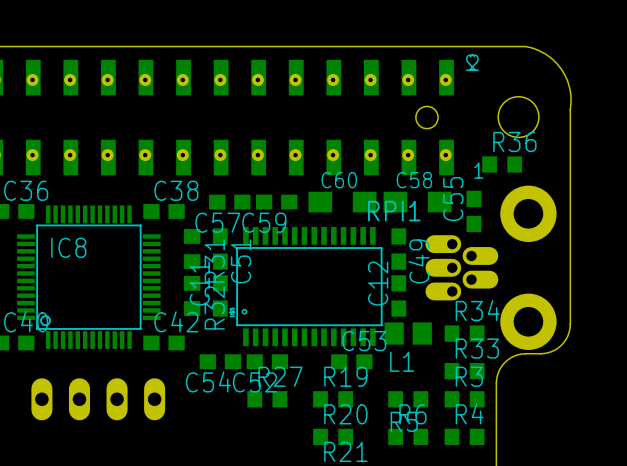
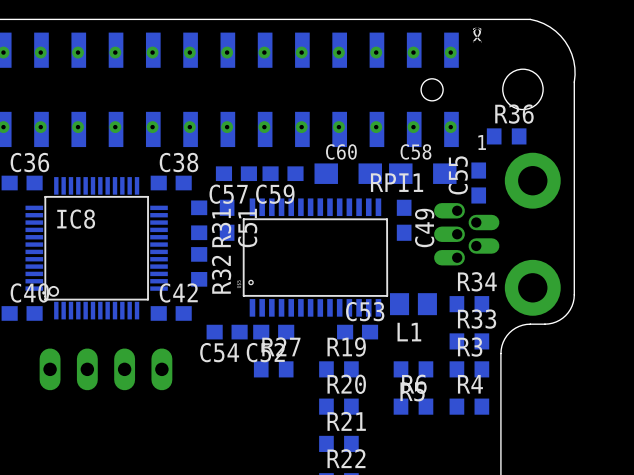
part footprint: [425, 185, 557, 350] -> [434, 152, 561, 316]
C11: (220, 295) -> none
C12: (398, 295) -> none

